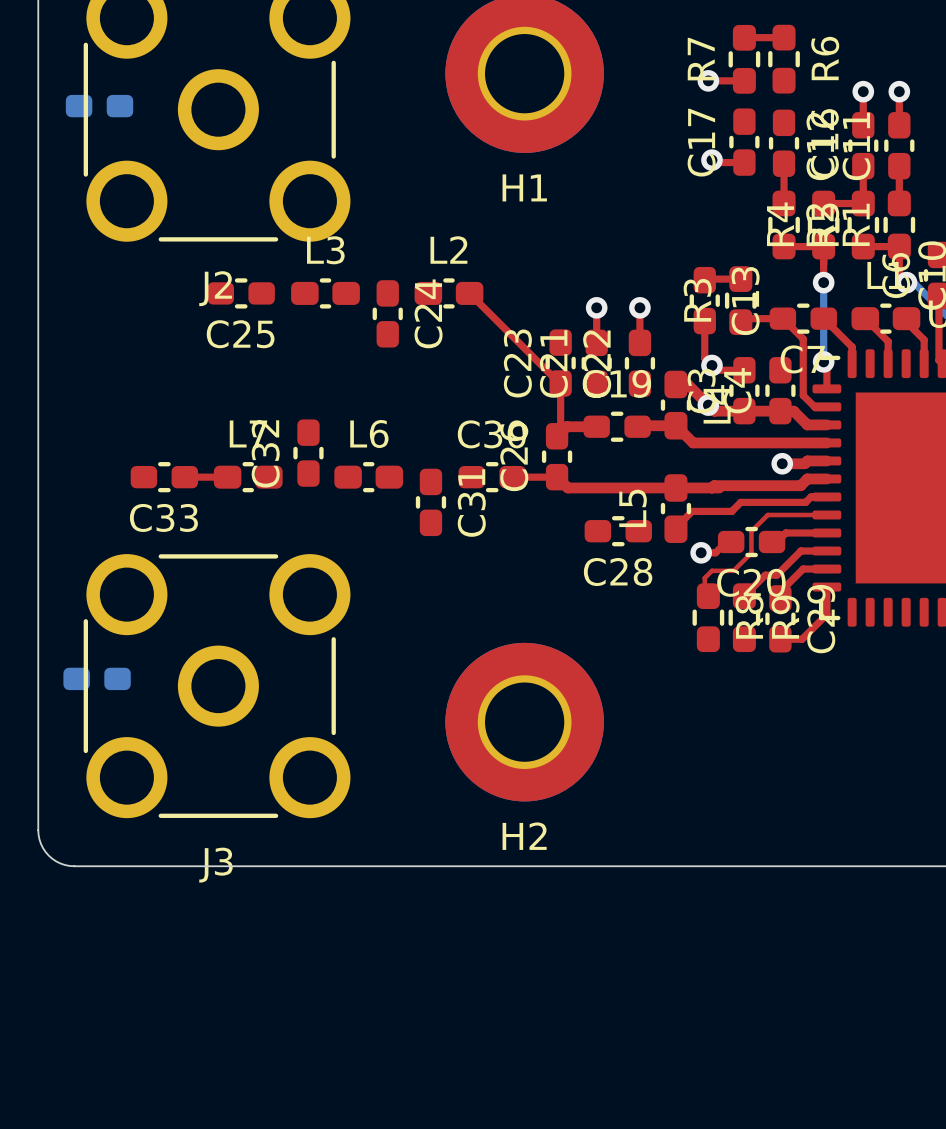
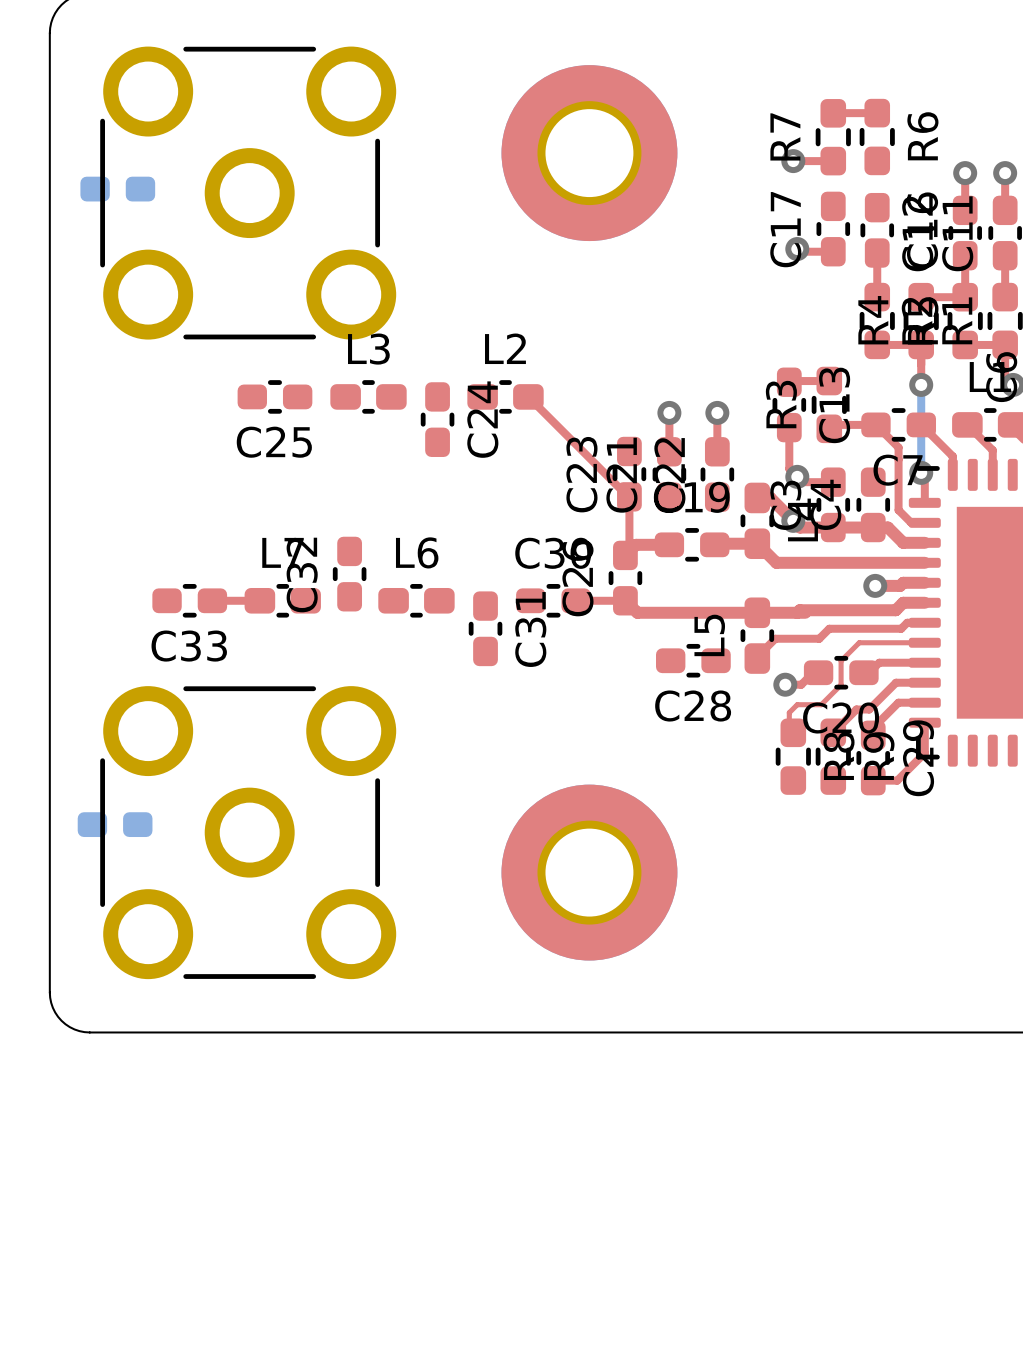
H1 name: H1 (524, 187) -> none
J2 name: J2 (215, 288) -> none
H2 name: H2 (524, 836) -> none
J3 name: J3 (215, 865) -> none

